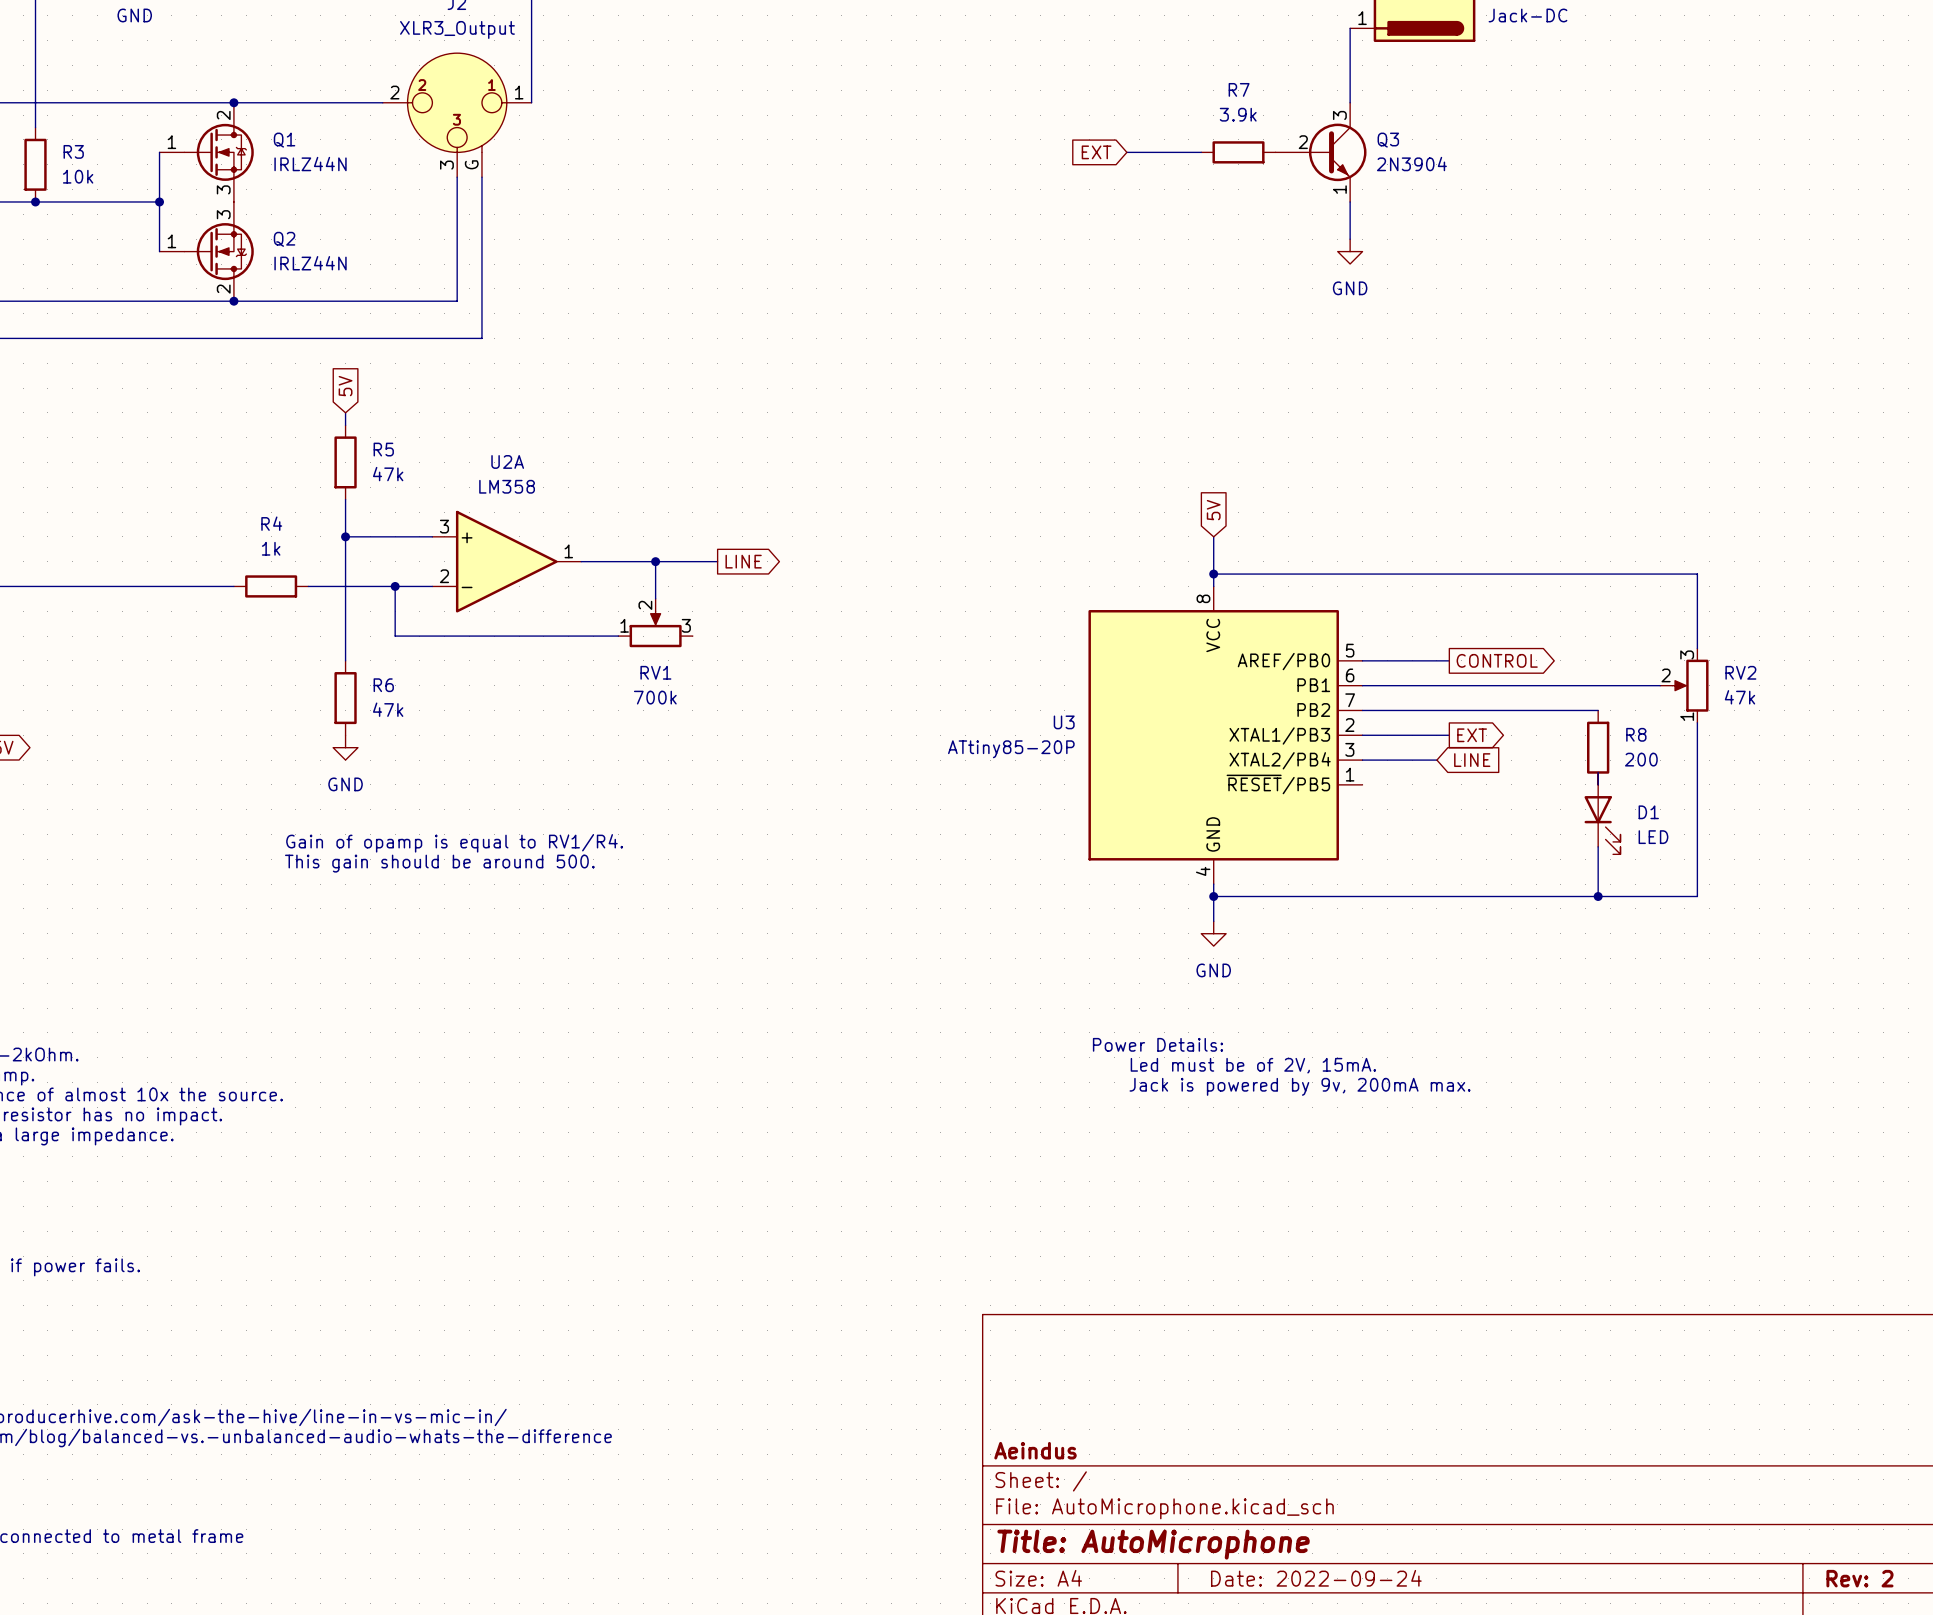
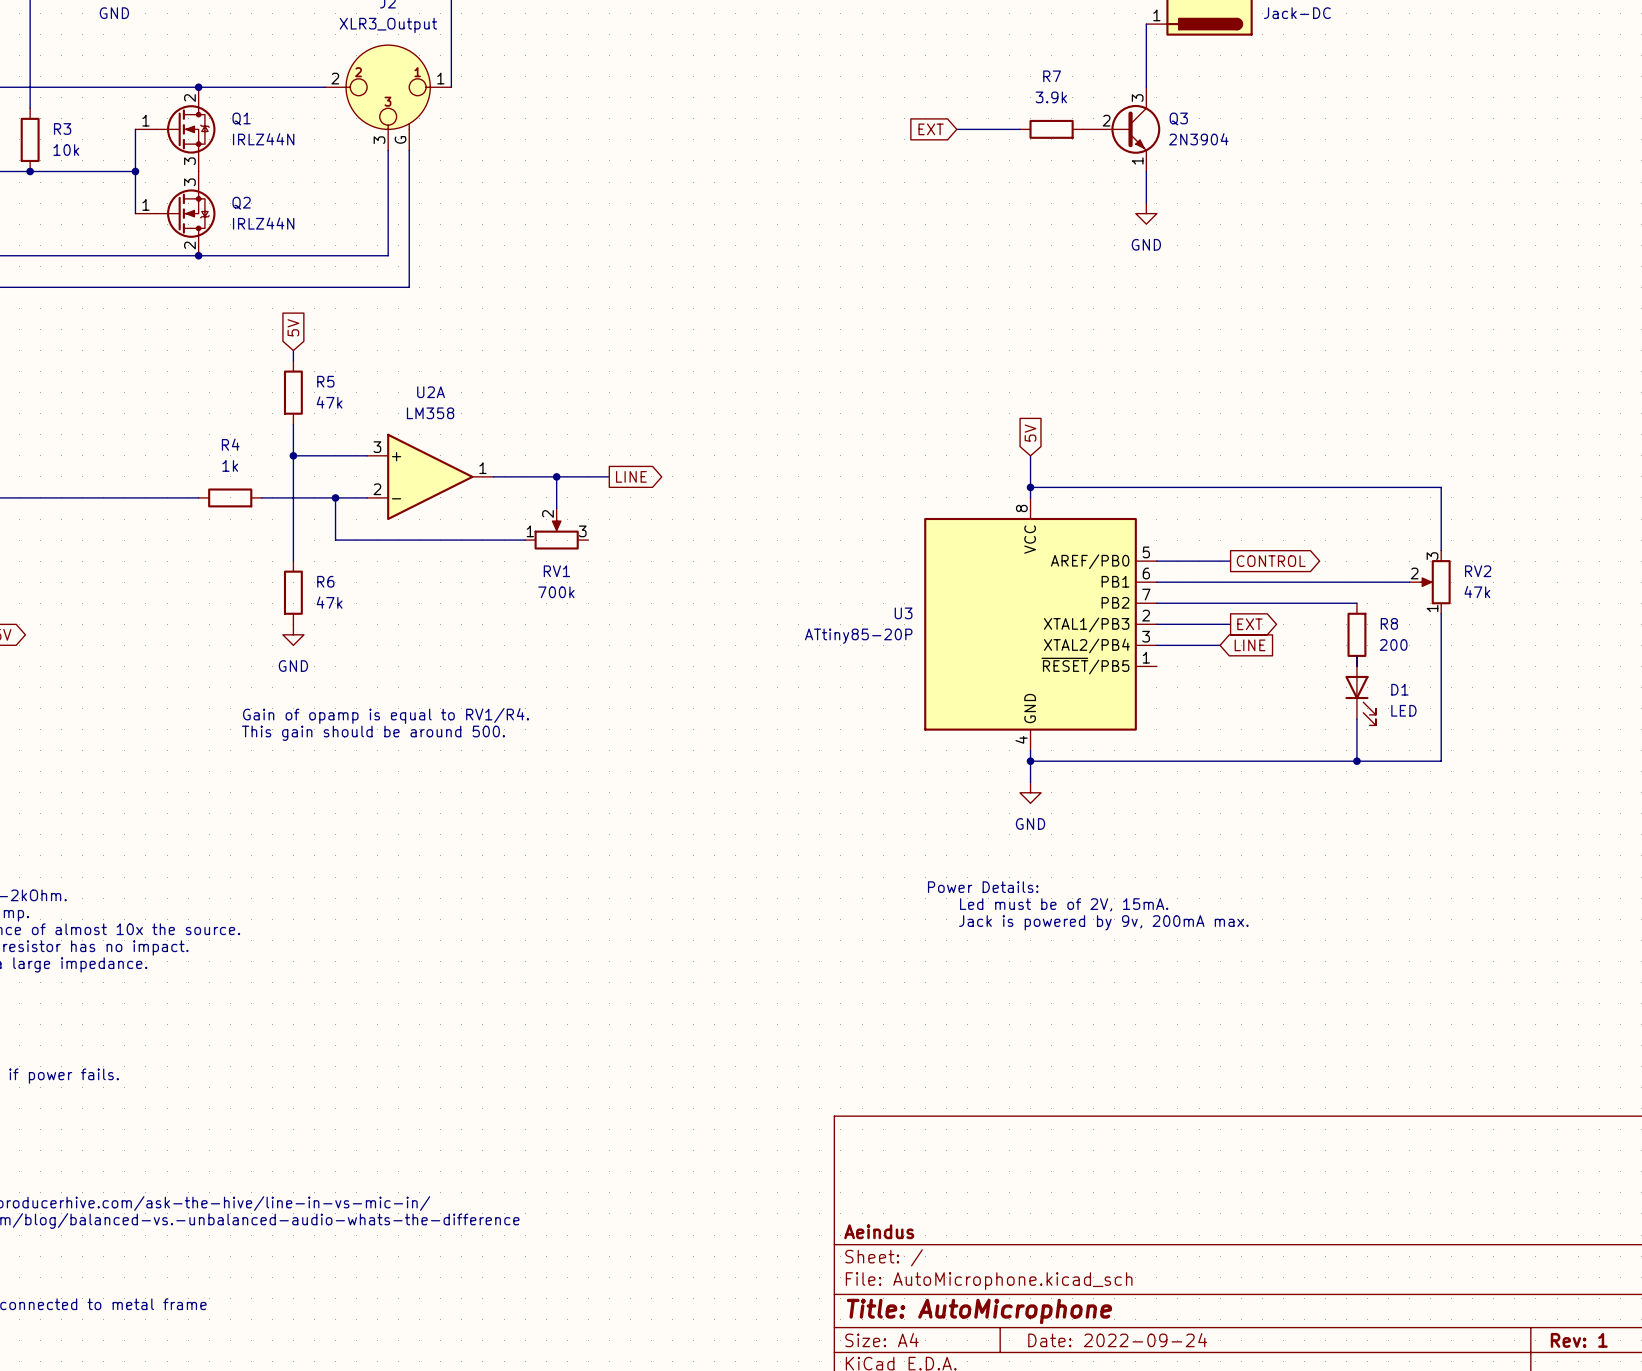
title block: Rev: 2 (1859, 1578) -> Rev: 1 (1579, 1340)

